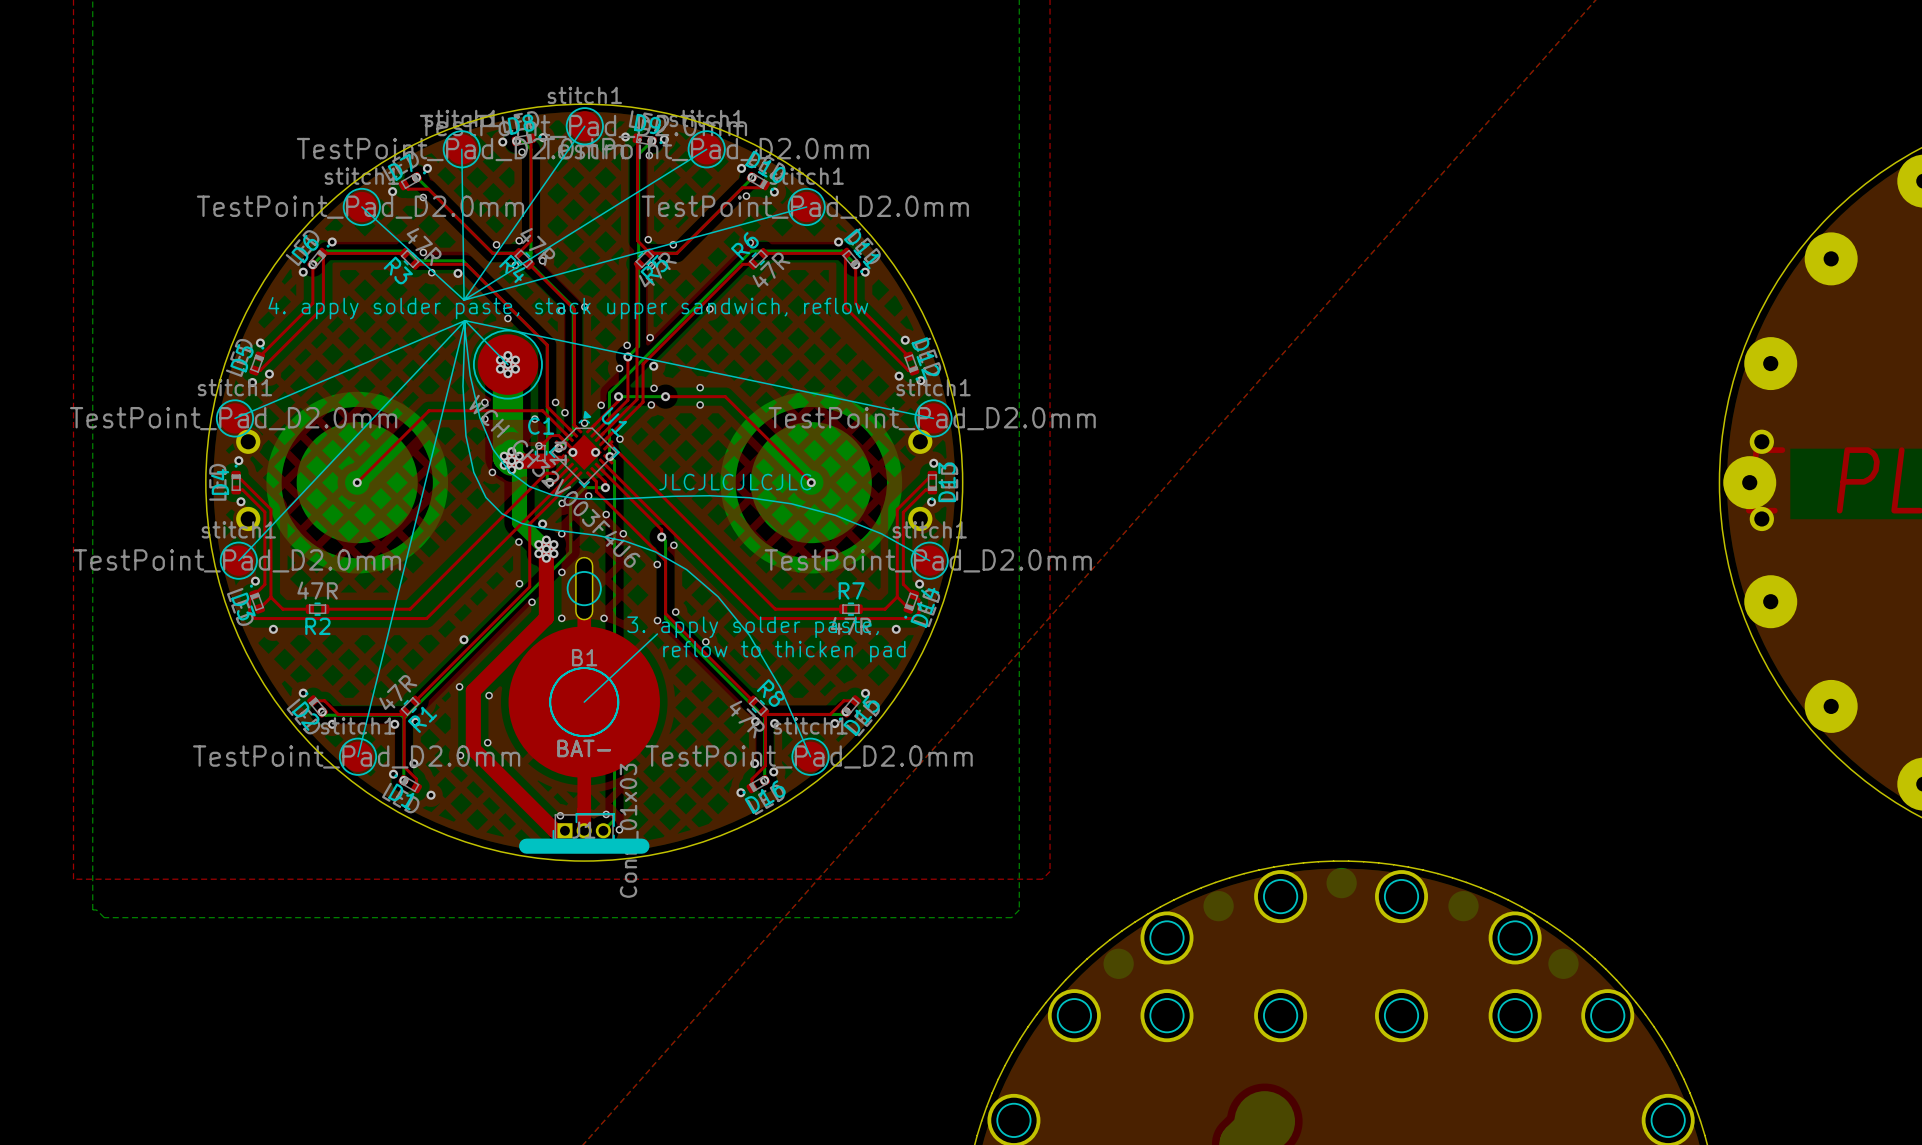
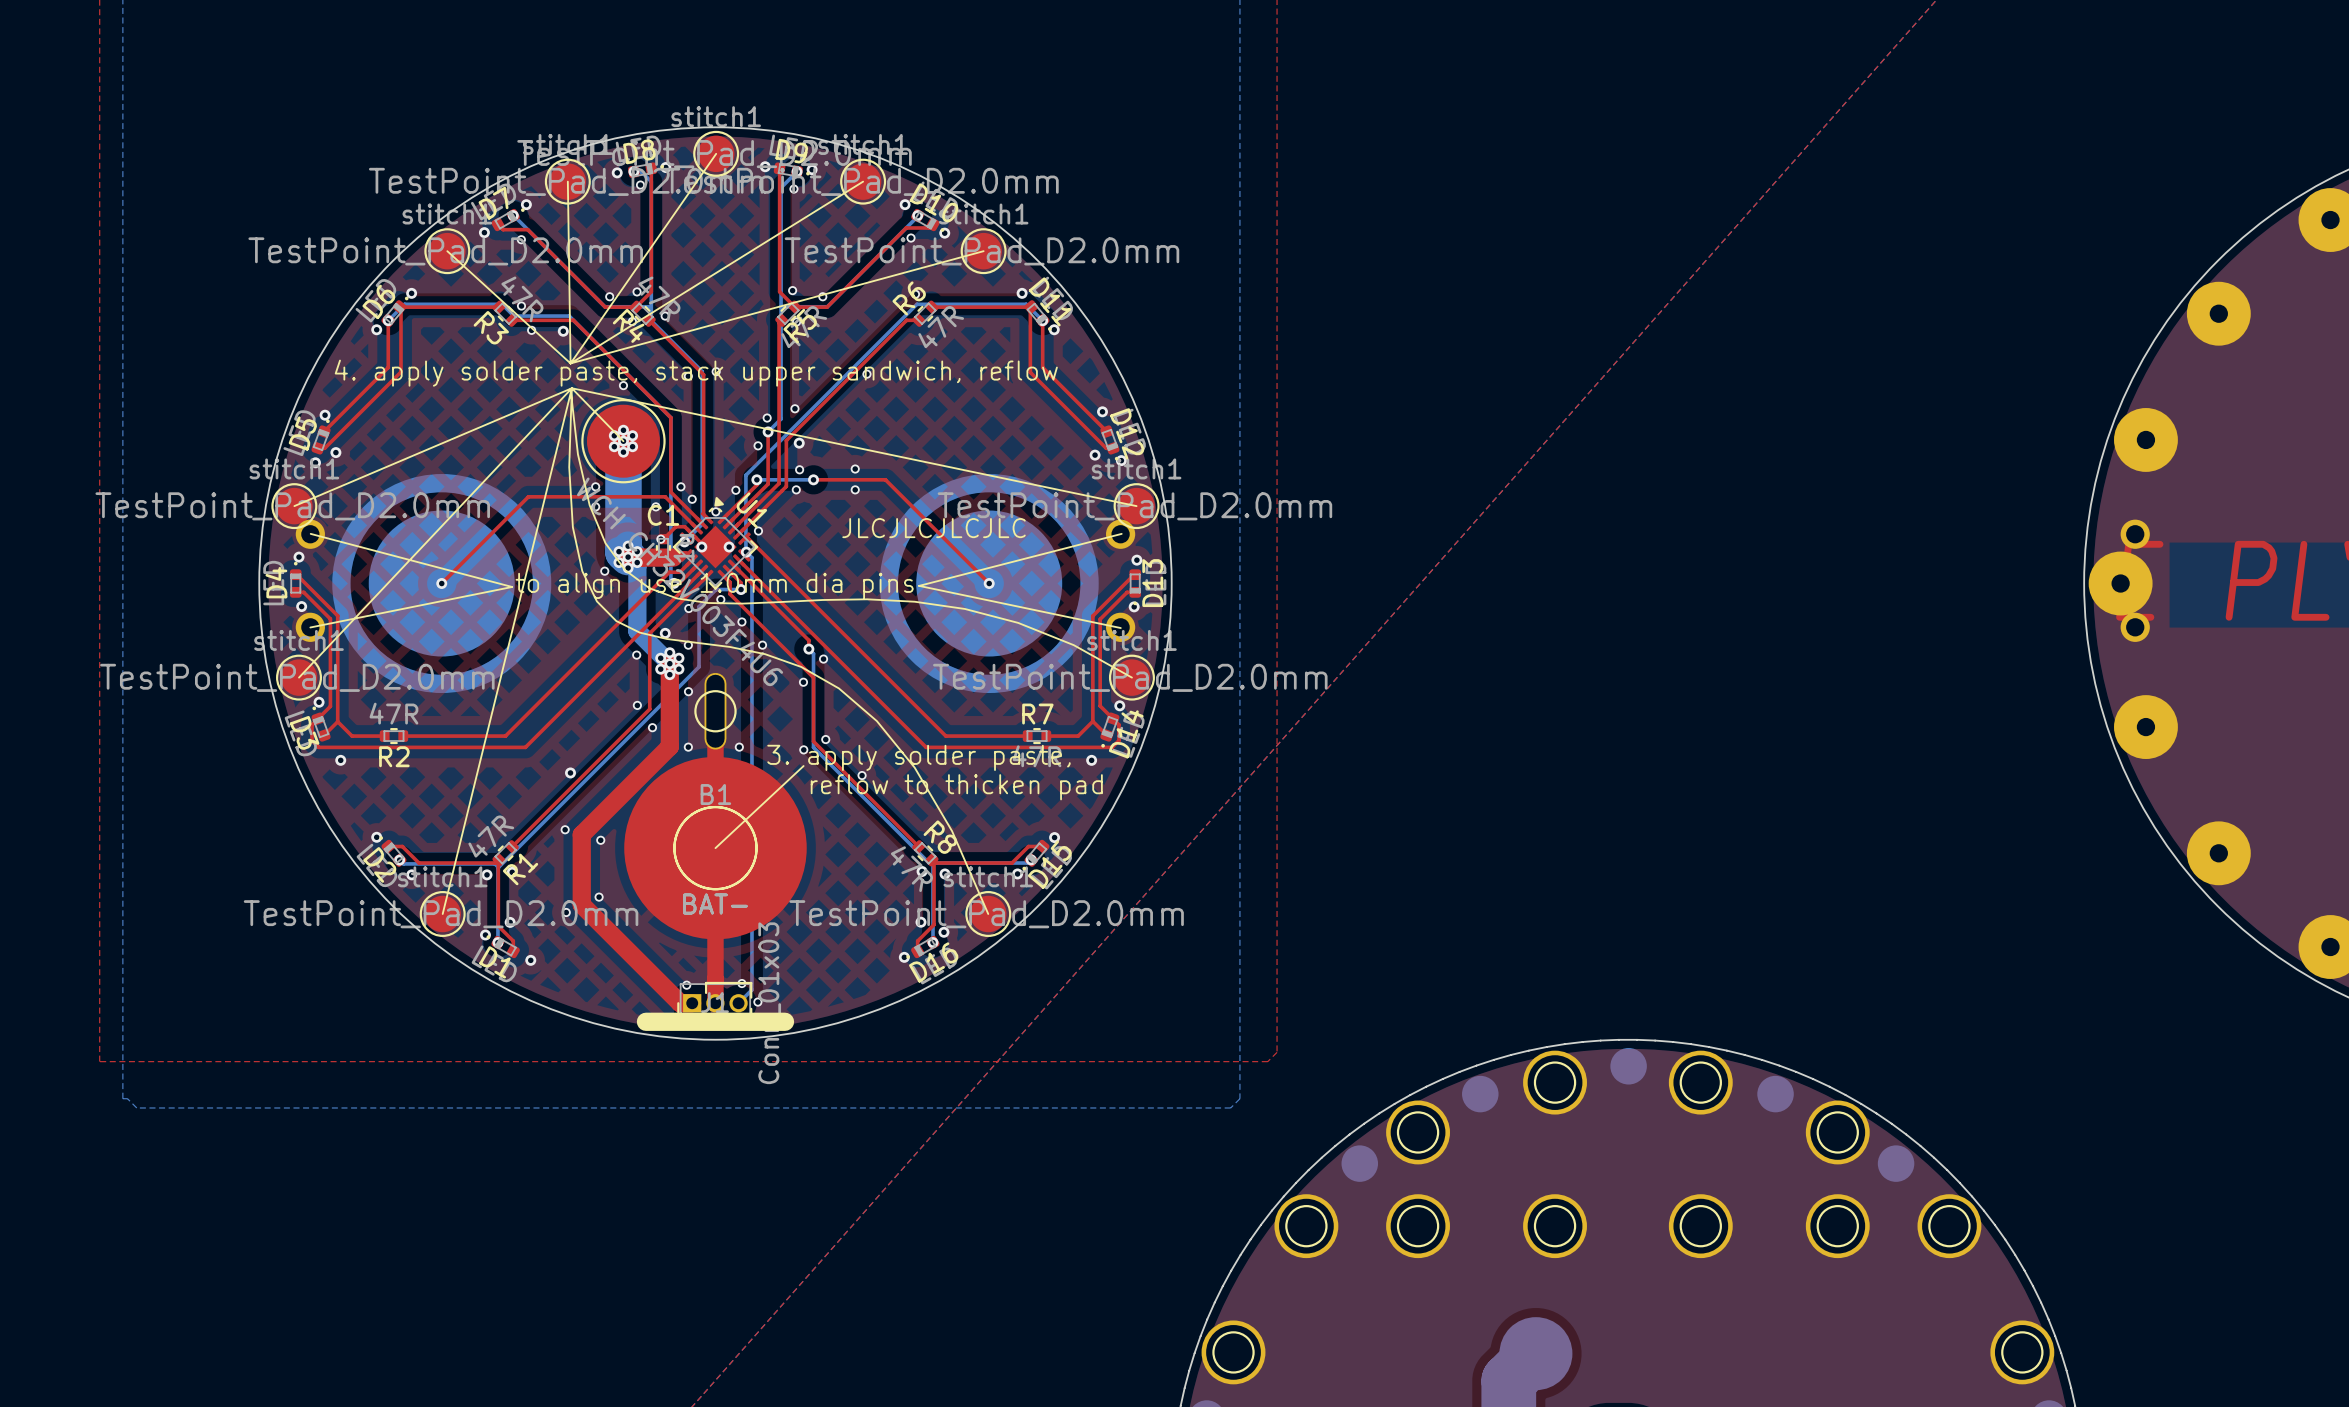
line: none -> (310, 533) (512, 586) (310, 627)
line: none -> (1121, 533) (919, 585) (1120, 628)
text position: JLCJLCJLCJLC (735, 482) -> JLCJLCJLCJLC (934, 528)
text: none -> to align use 1.0mm dia pins (714, 585)

